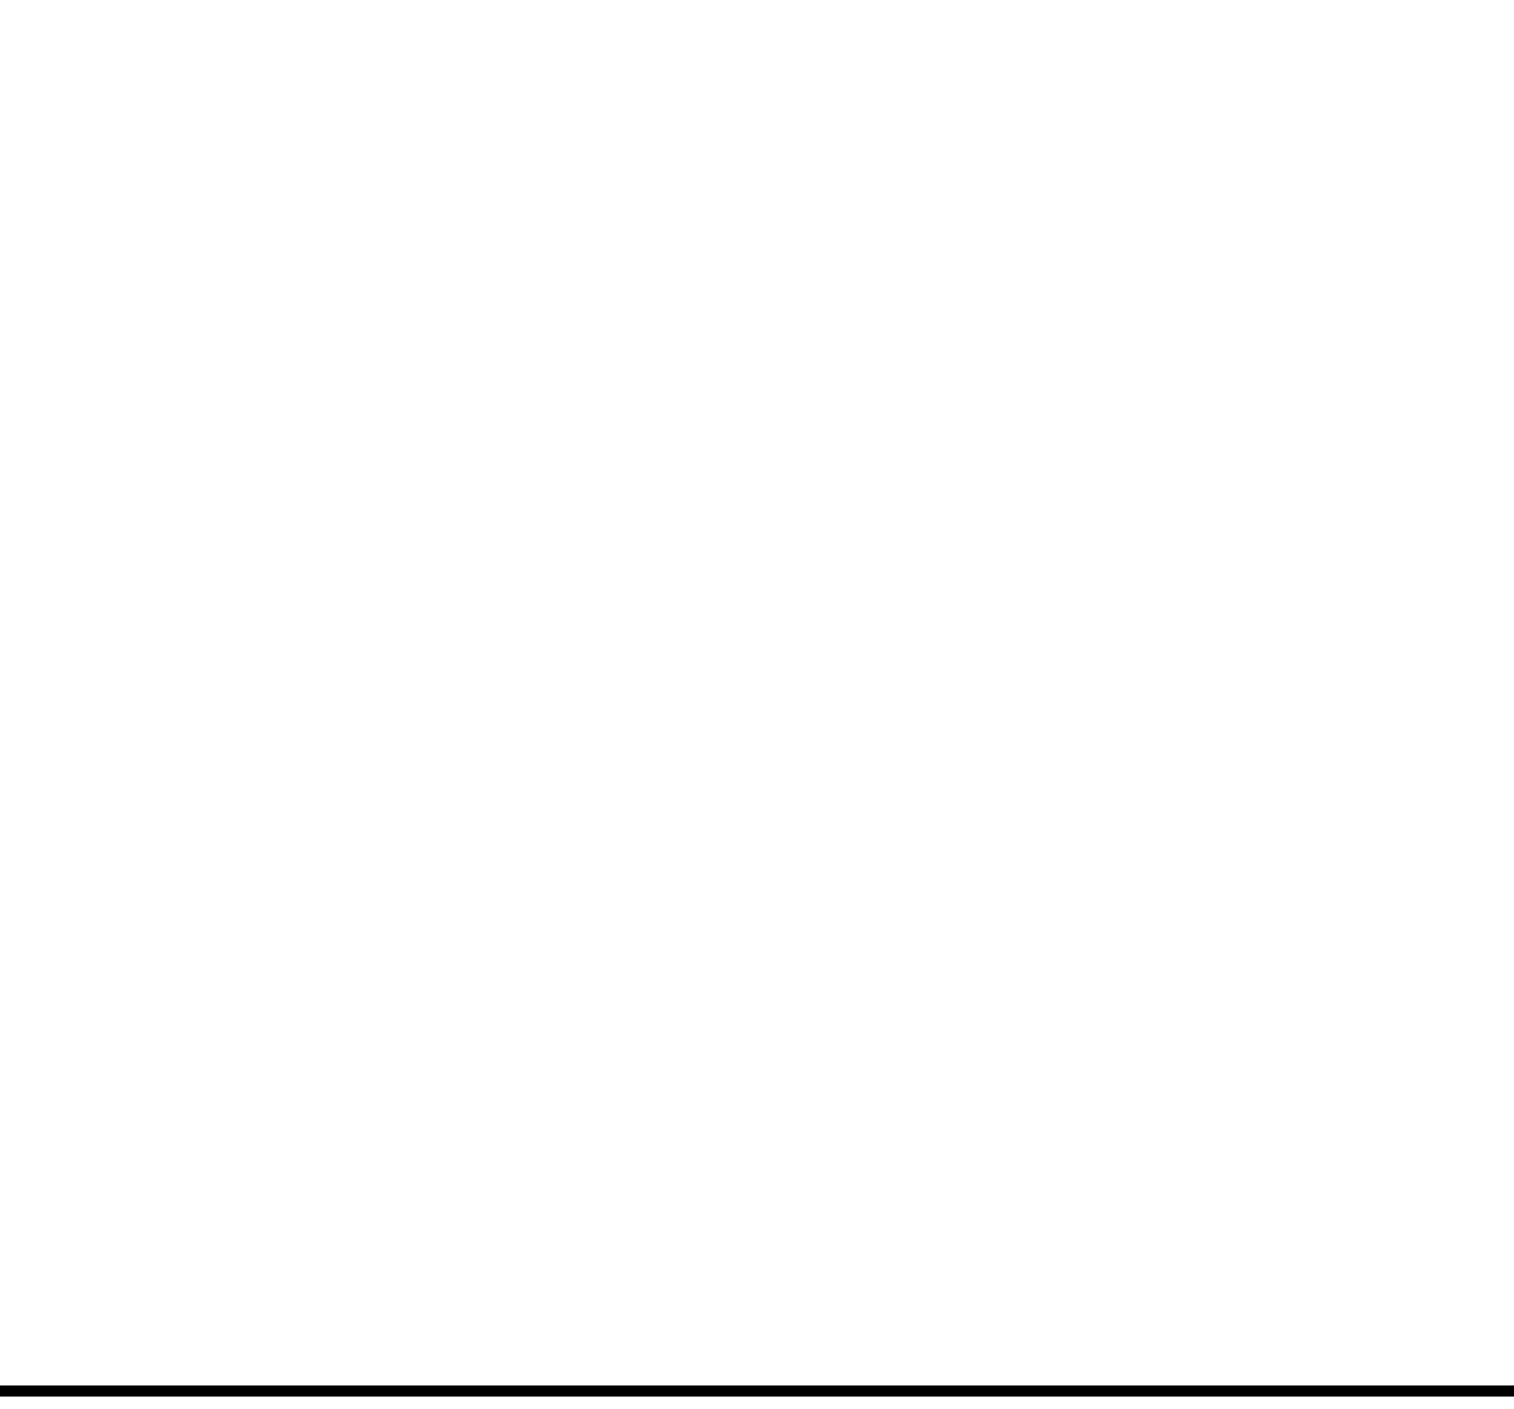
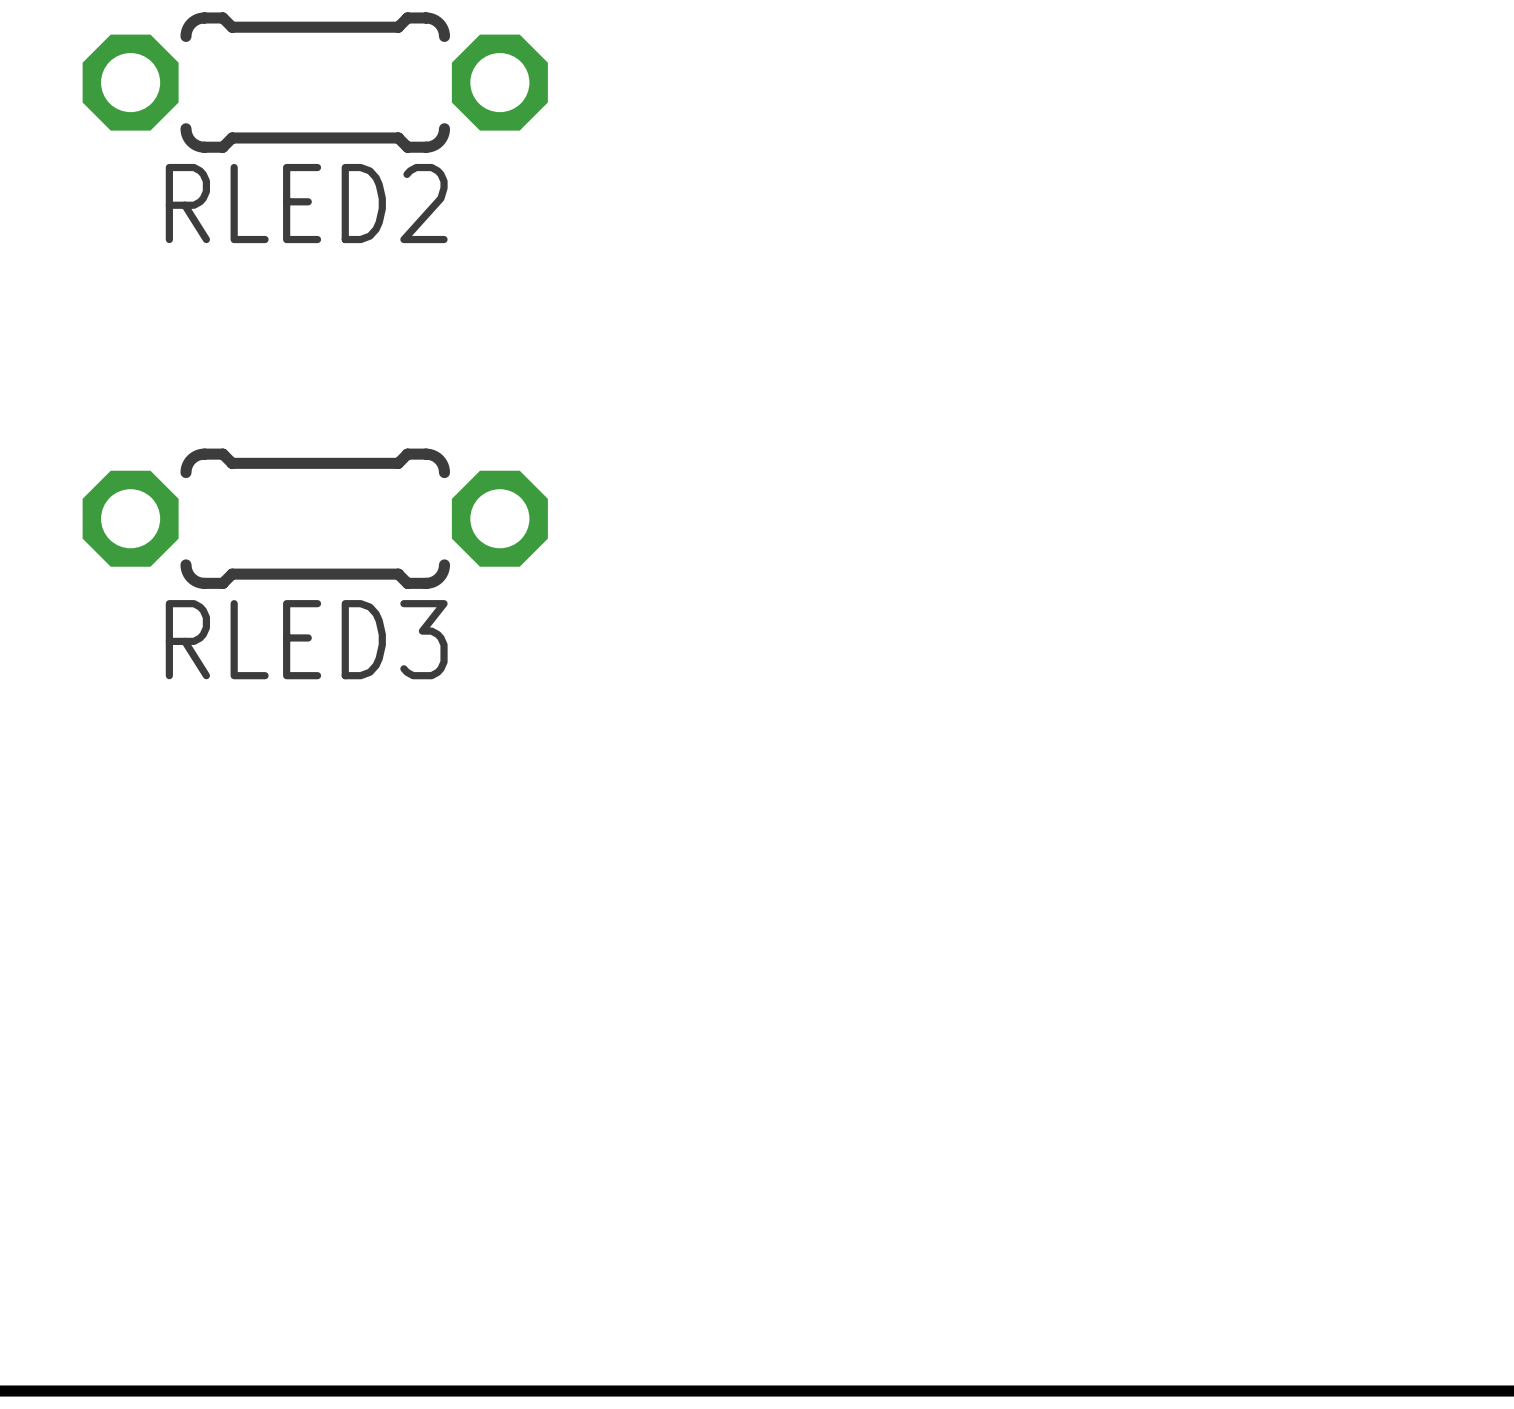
RLED2: none -> (315, 82)
RLED3: none -> (315, 518)

